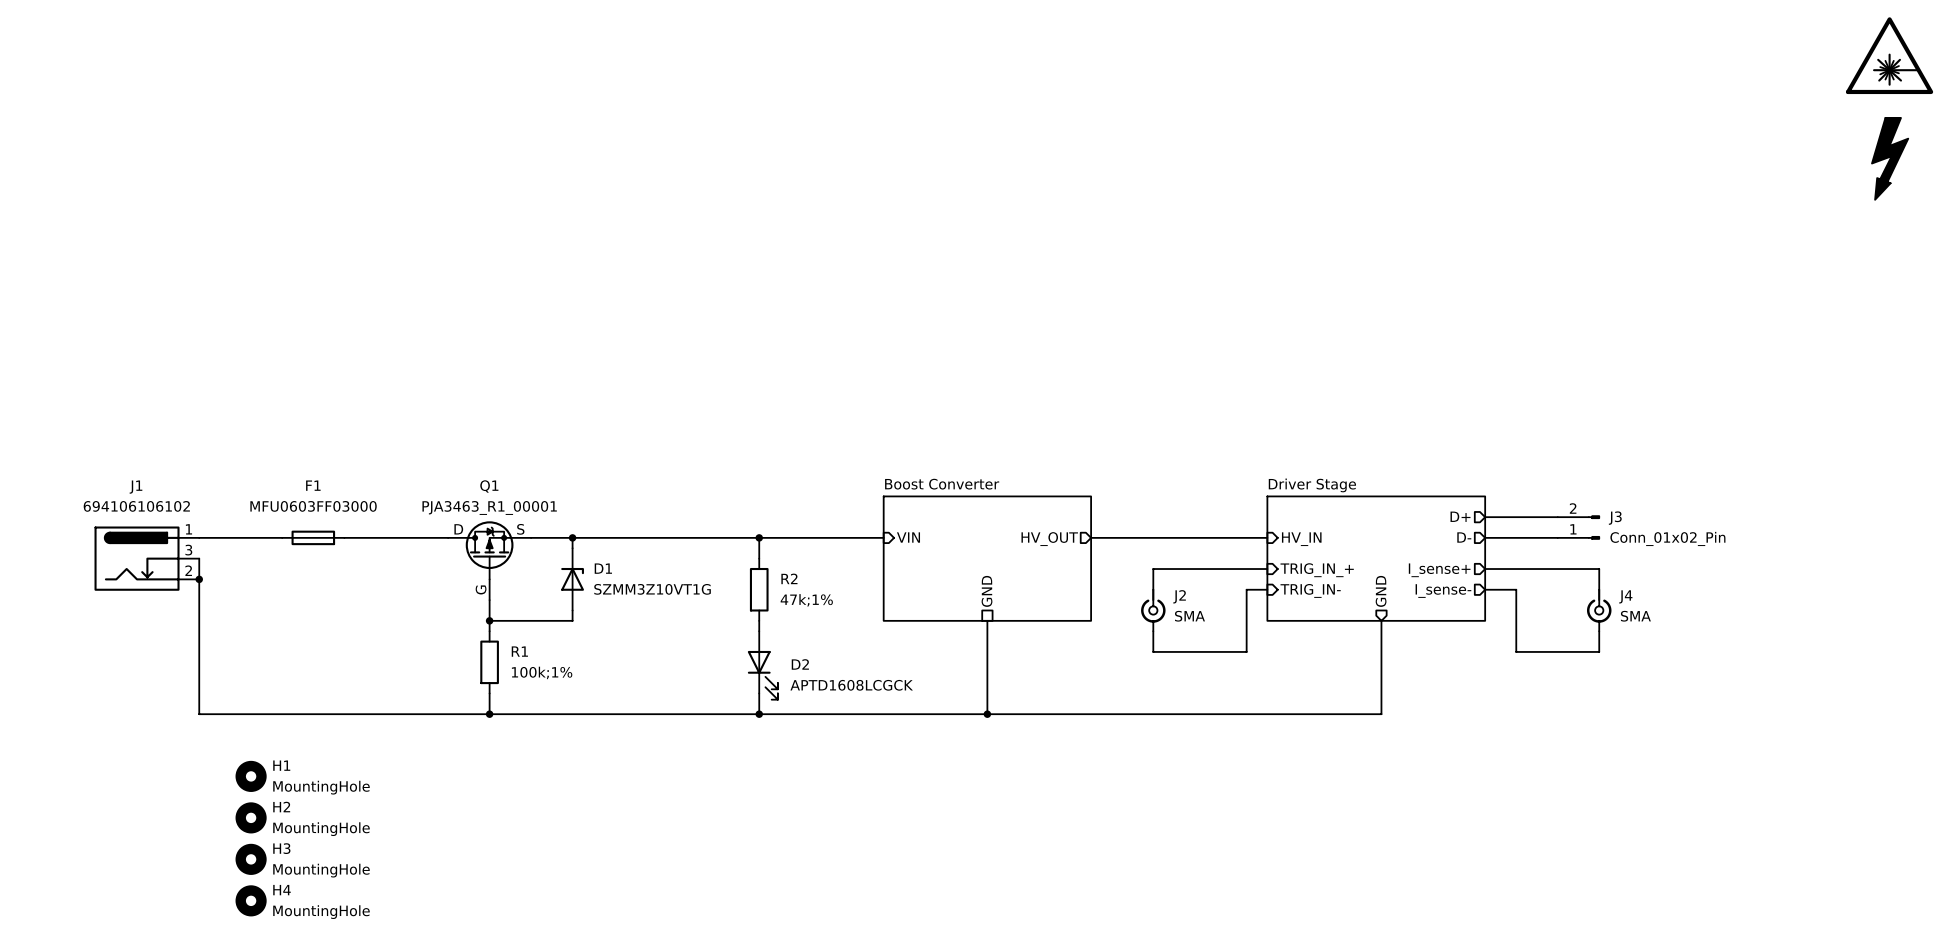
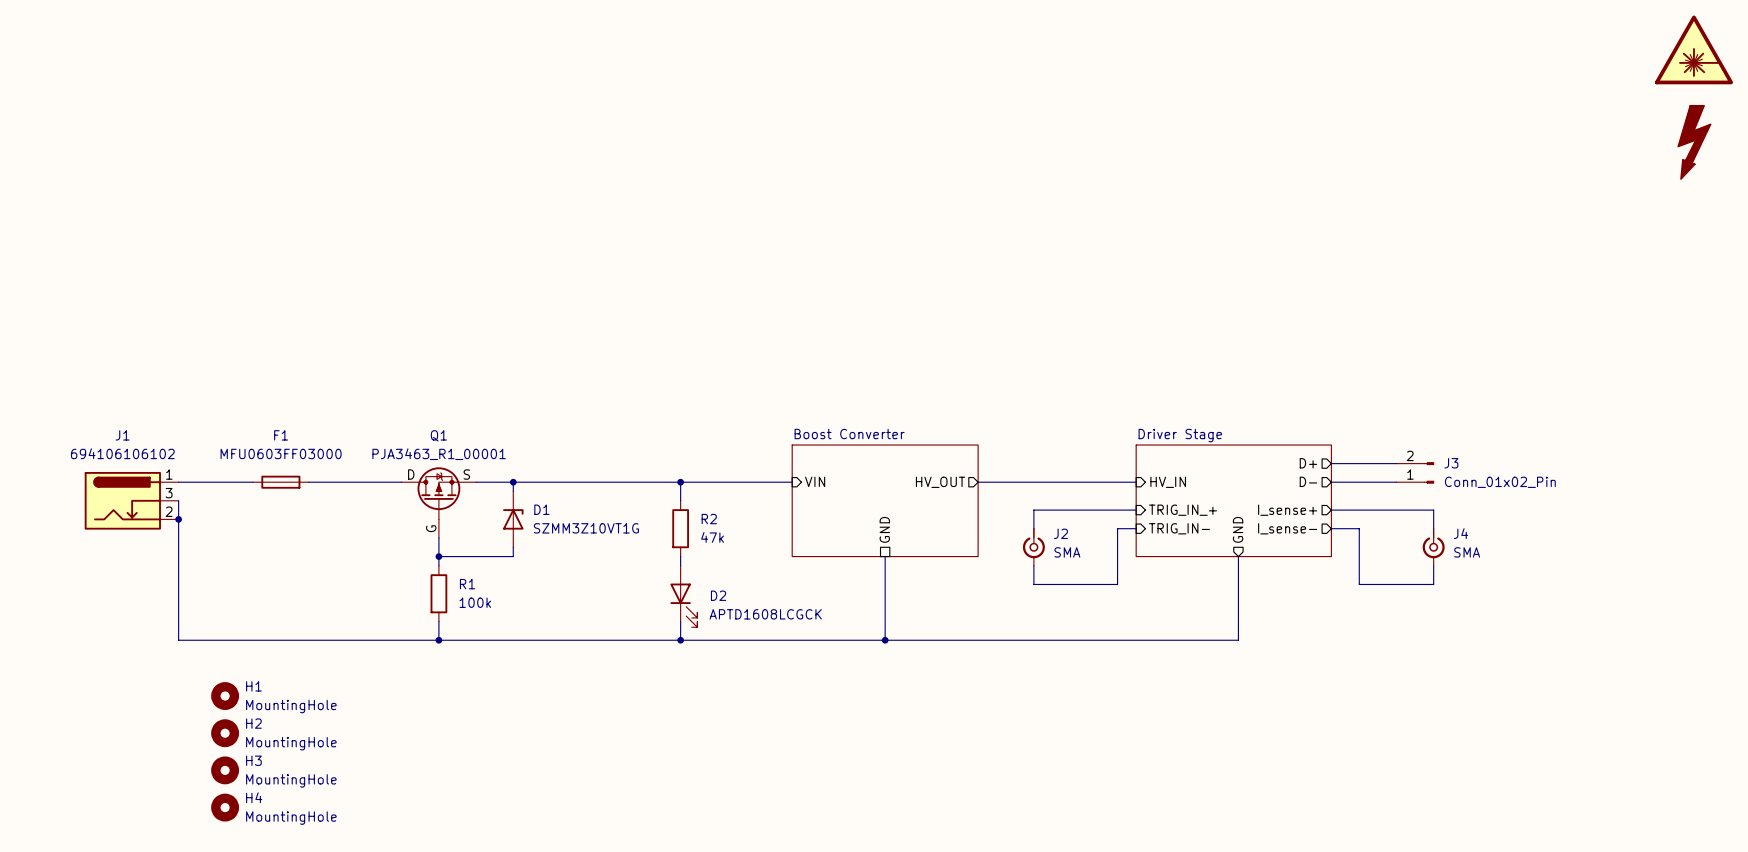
R2 value: 47k;1% (806, 600) -> 47k (712, 537)
R1 value: 100k;1% (542, 672) -> 100k (475, 602)

